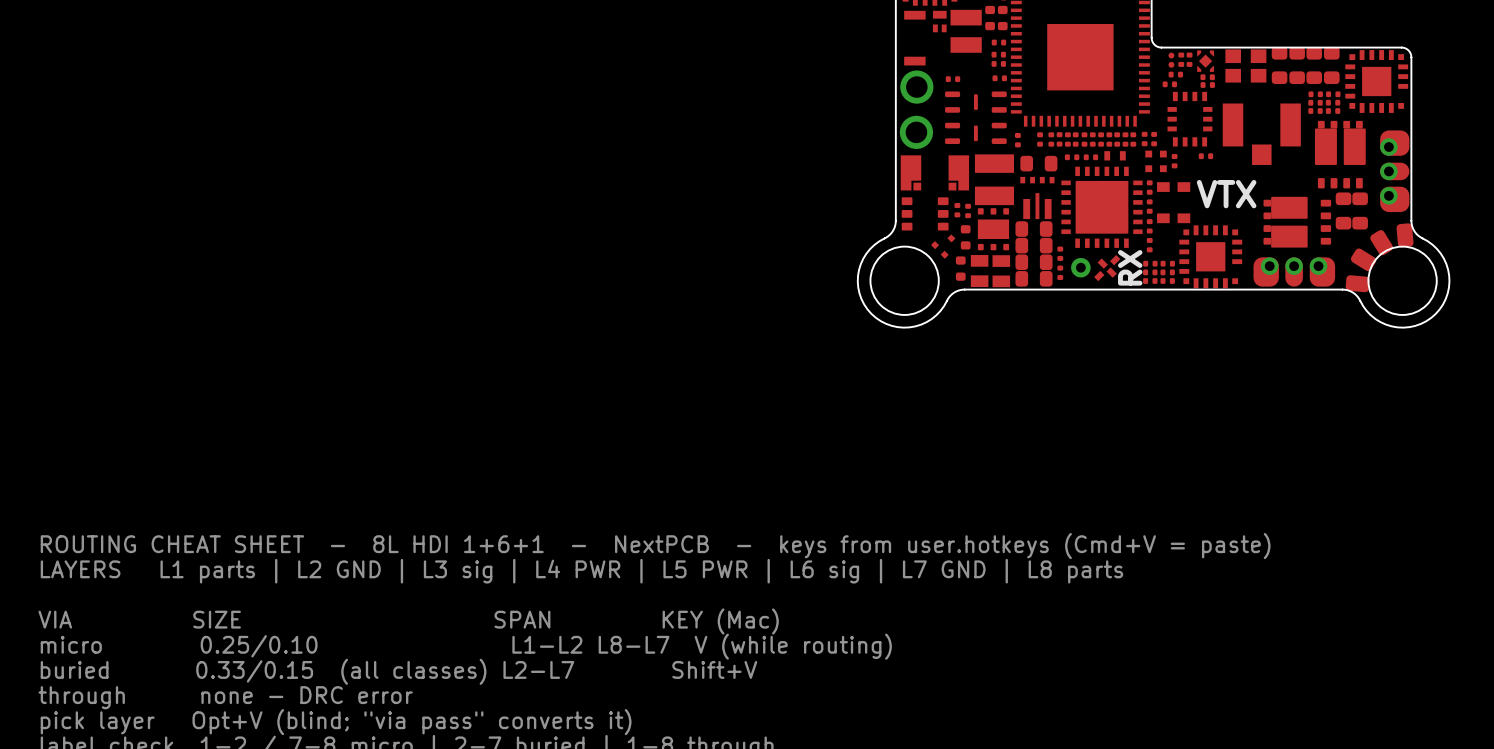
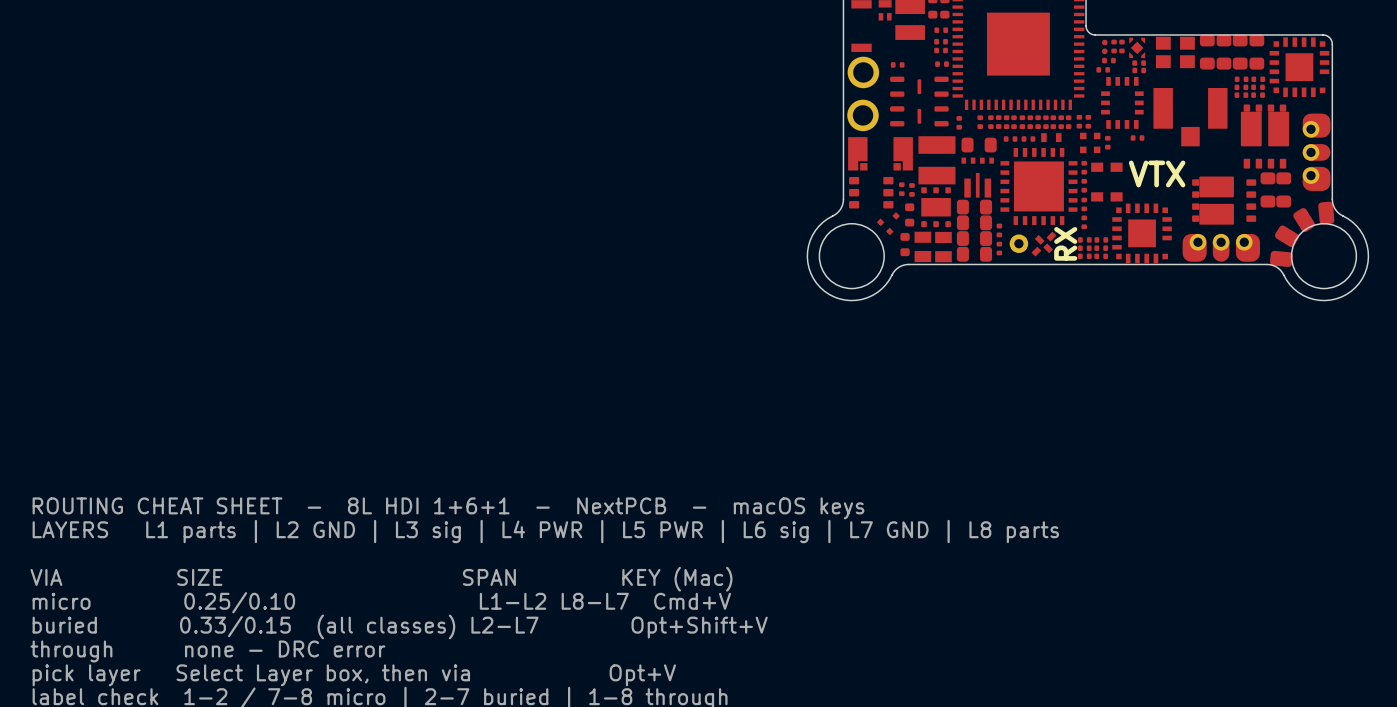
text: ROUTING CHEAT SHEET - 8L HDI 1+6+1 - NextPCB - keys from user.hotkeys (Cmd+V = paste) (655, 546) -> ROUTING CHEAT SHEET - 8L HDI 1+6+1 - NextPCB - macOS keys (448, 508)
text: micro 0.25/0.10 L1-L2 L8-L7 V (while routing) (466, 646) -> micro 0.25/0.10 L1-L2 L8-L7 Cmd+V (381, 602)
text: buried 0.33/0.15 (all classes) L2-L7 Shift+V (398, 671) -> buried 0.33/0.15 (all classes) L2-L7 Opt+Shift+V (400, 626)
text: pick layer Opt+V (blind; "via pass" converts it) (336, 722) -> pick layer Select Layer box, then via Opt+V (354, 675)

